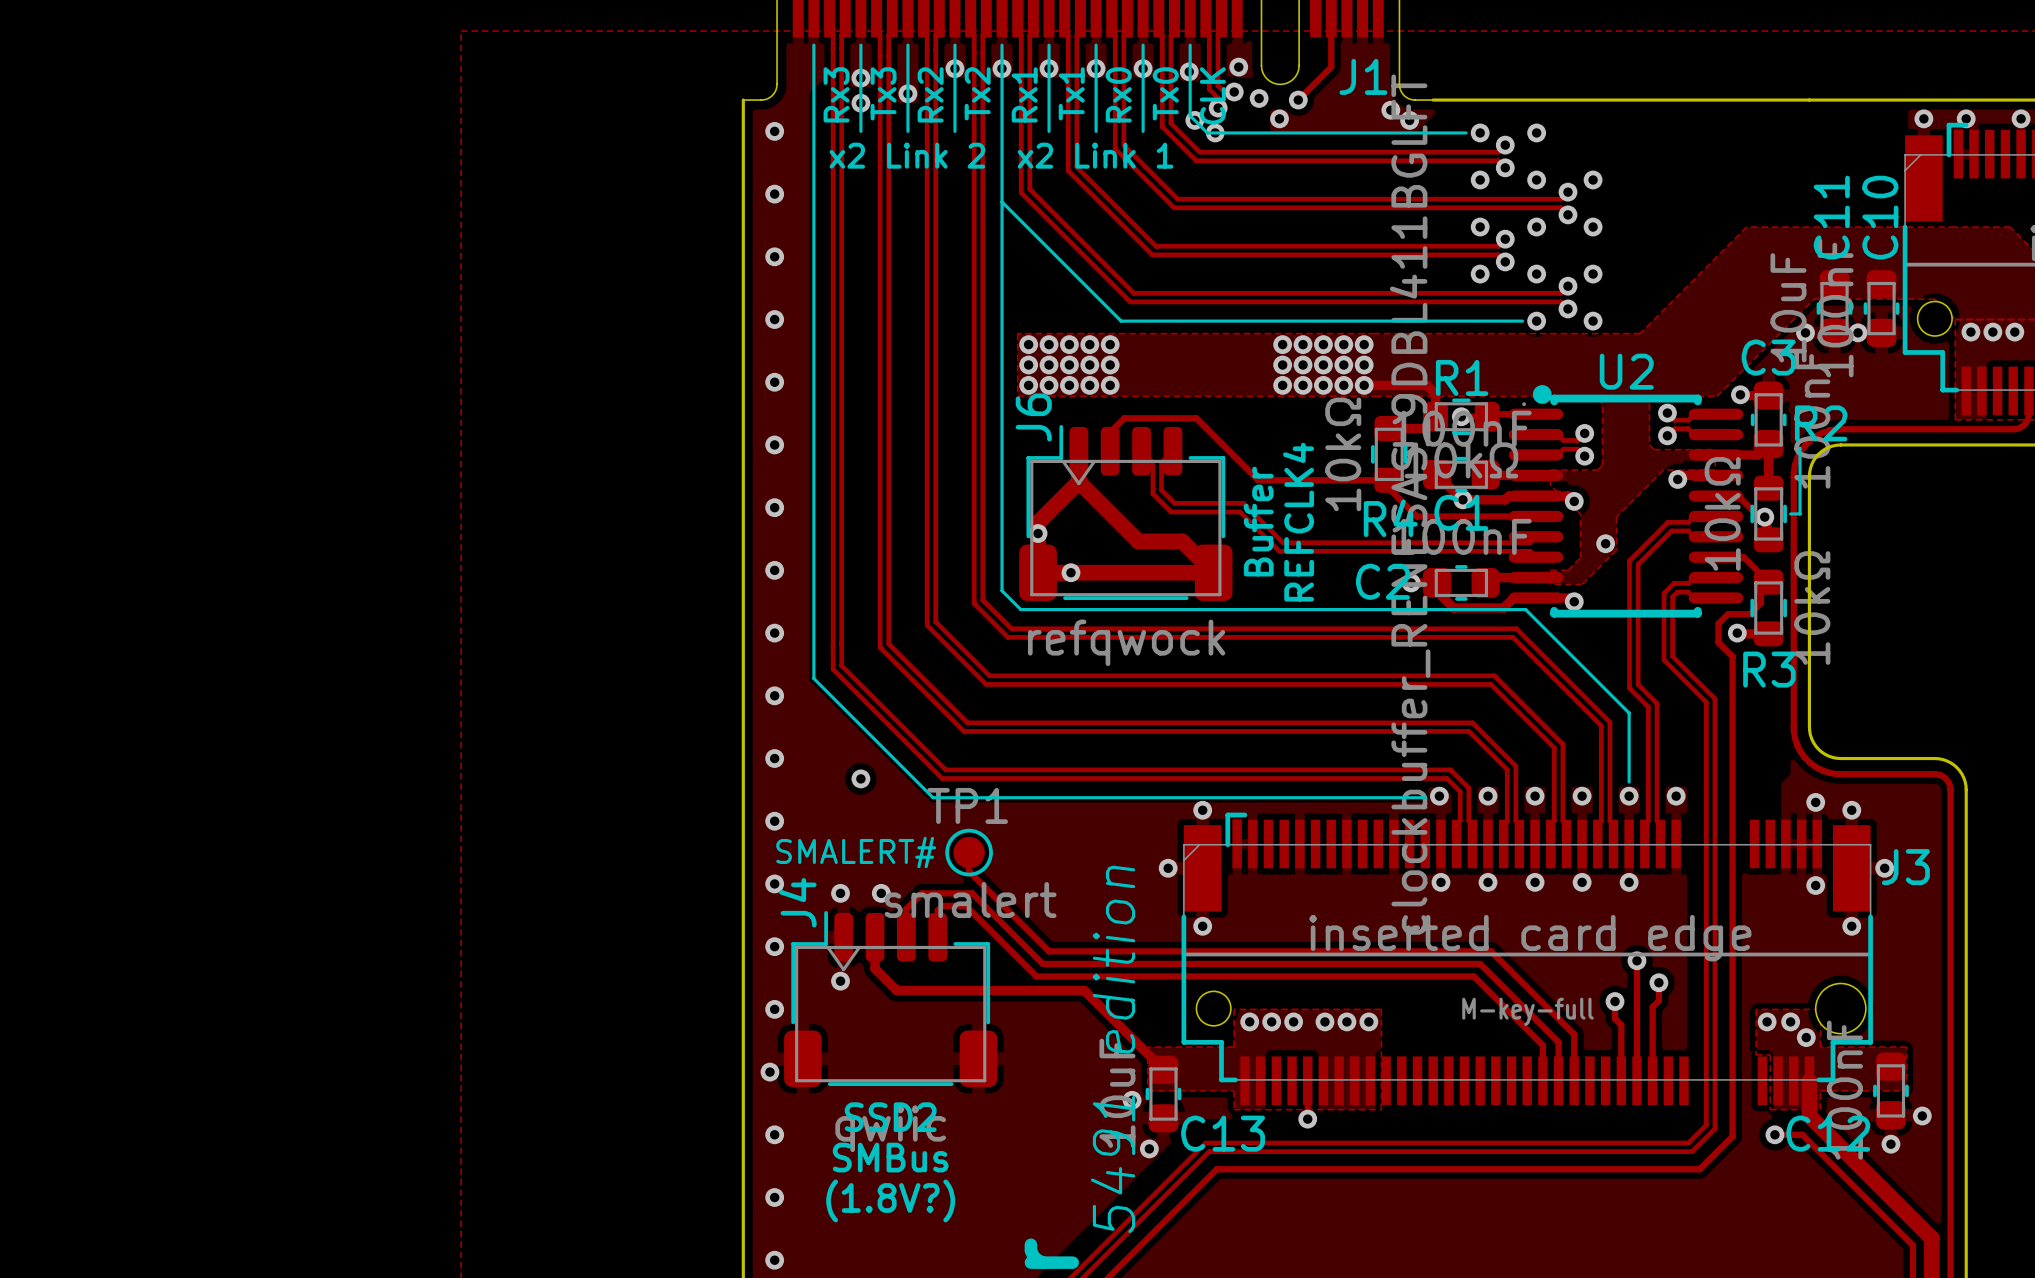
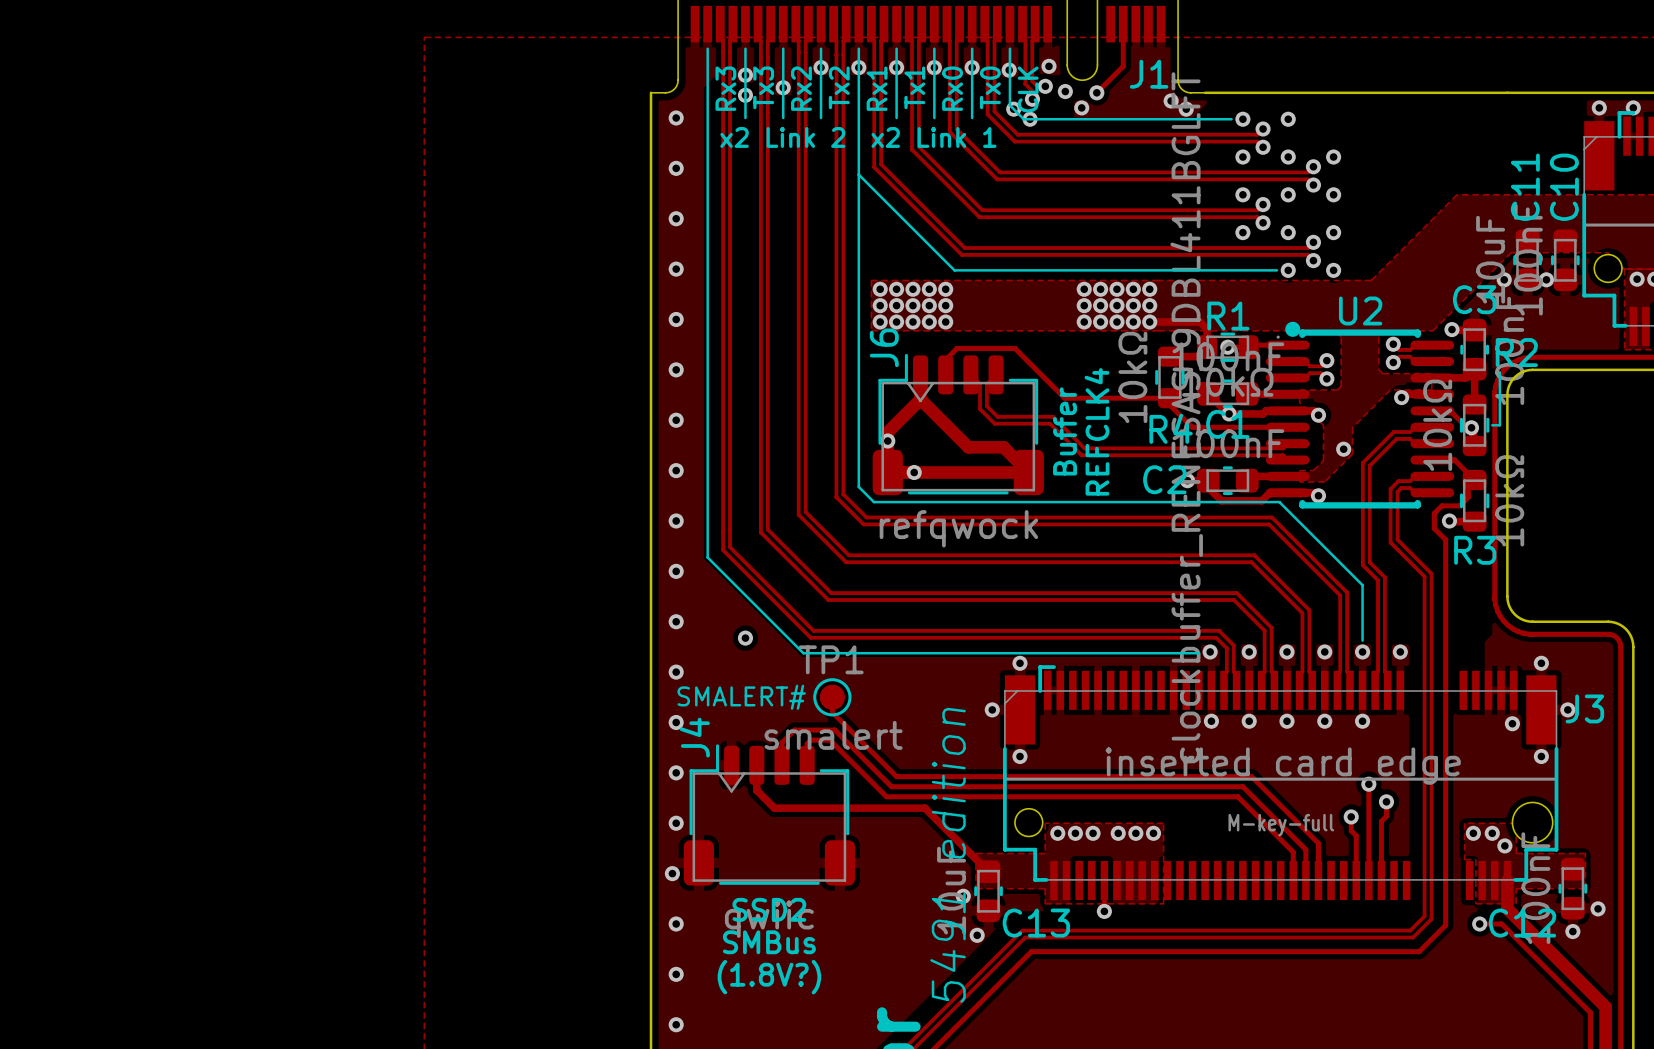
via: (1815, 802) -> none
via: (840, 893) -> none
via: (881, 893) -> none
via: (840, 981) -> none

